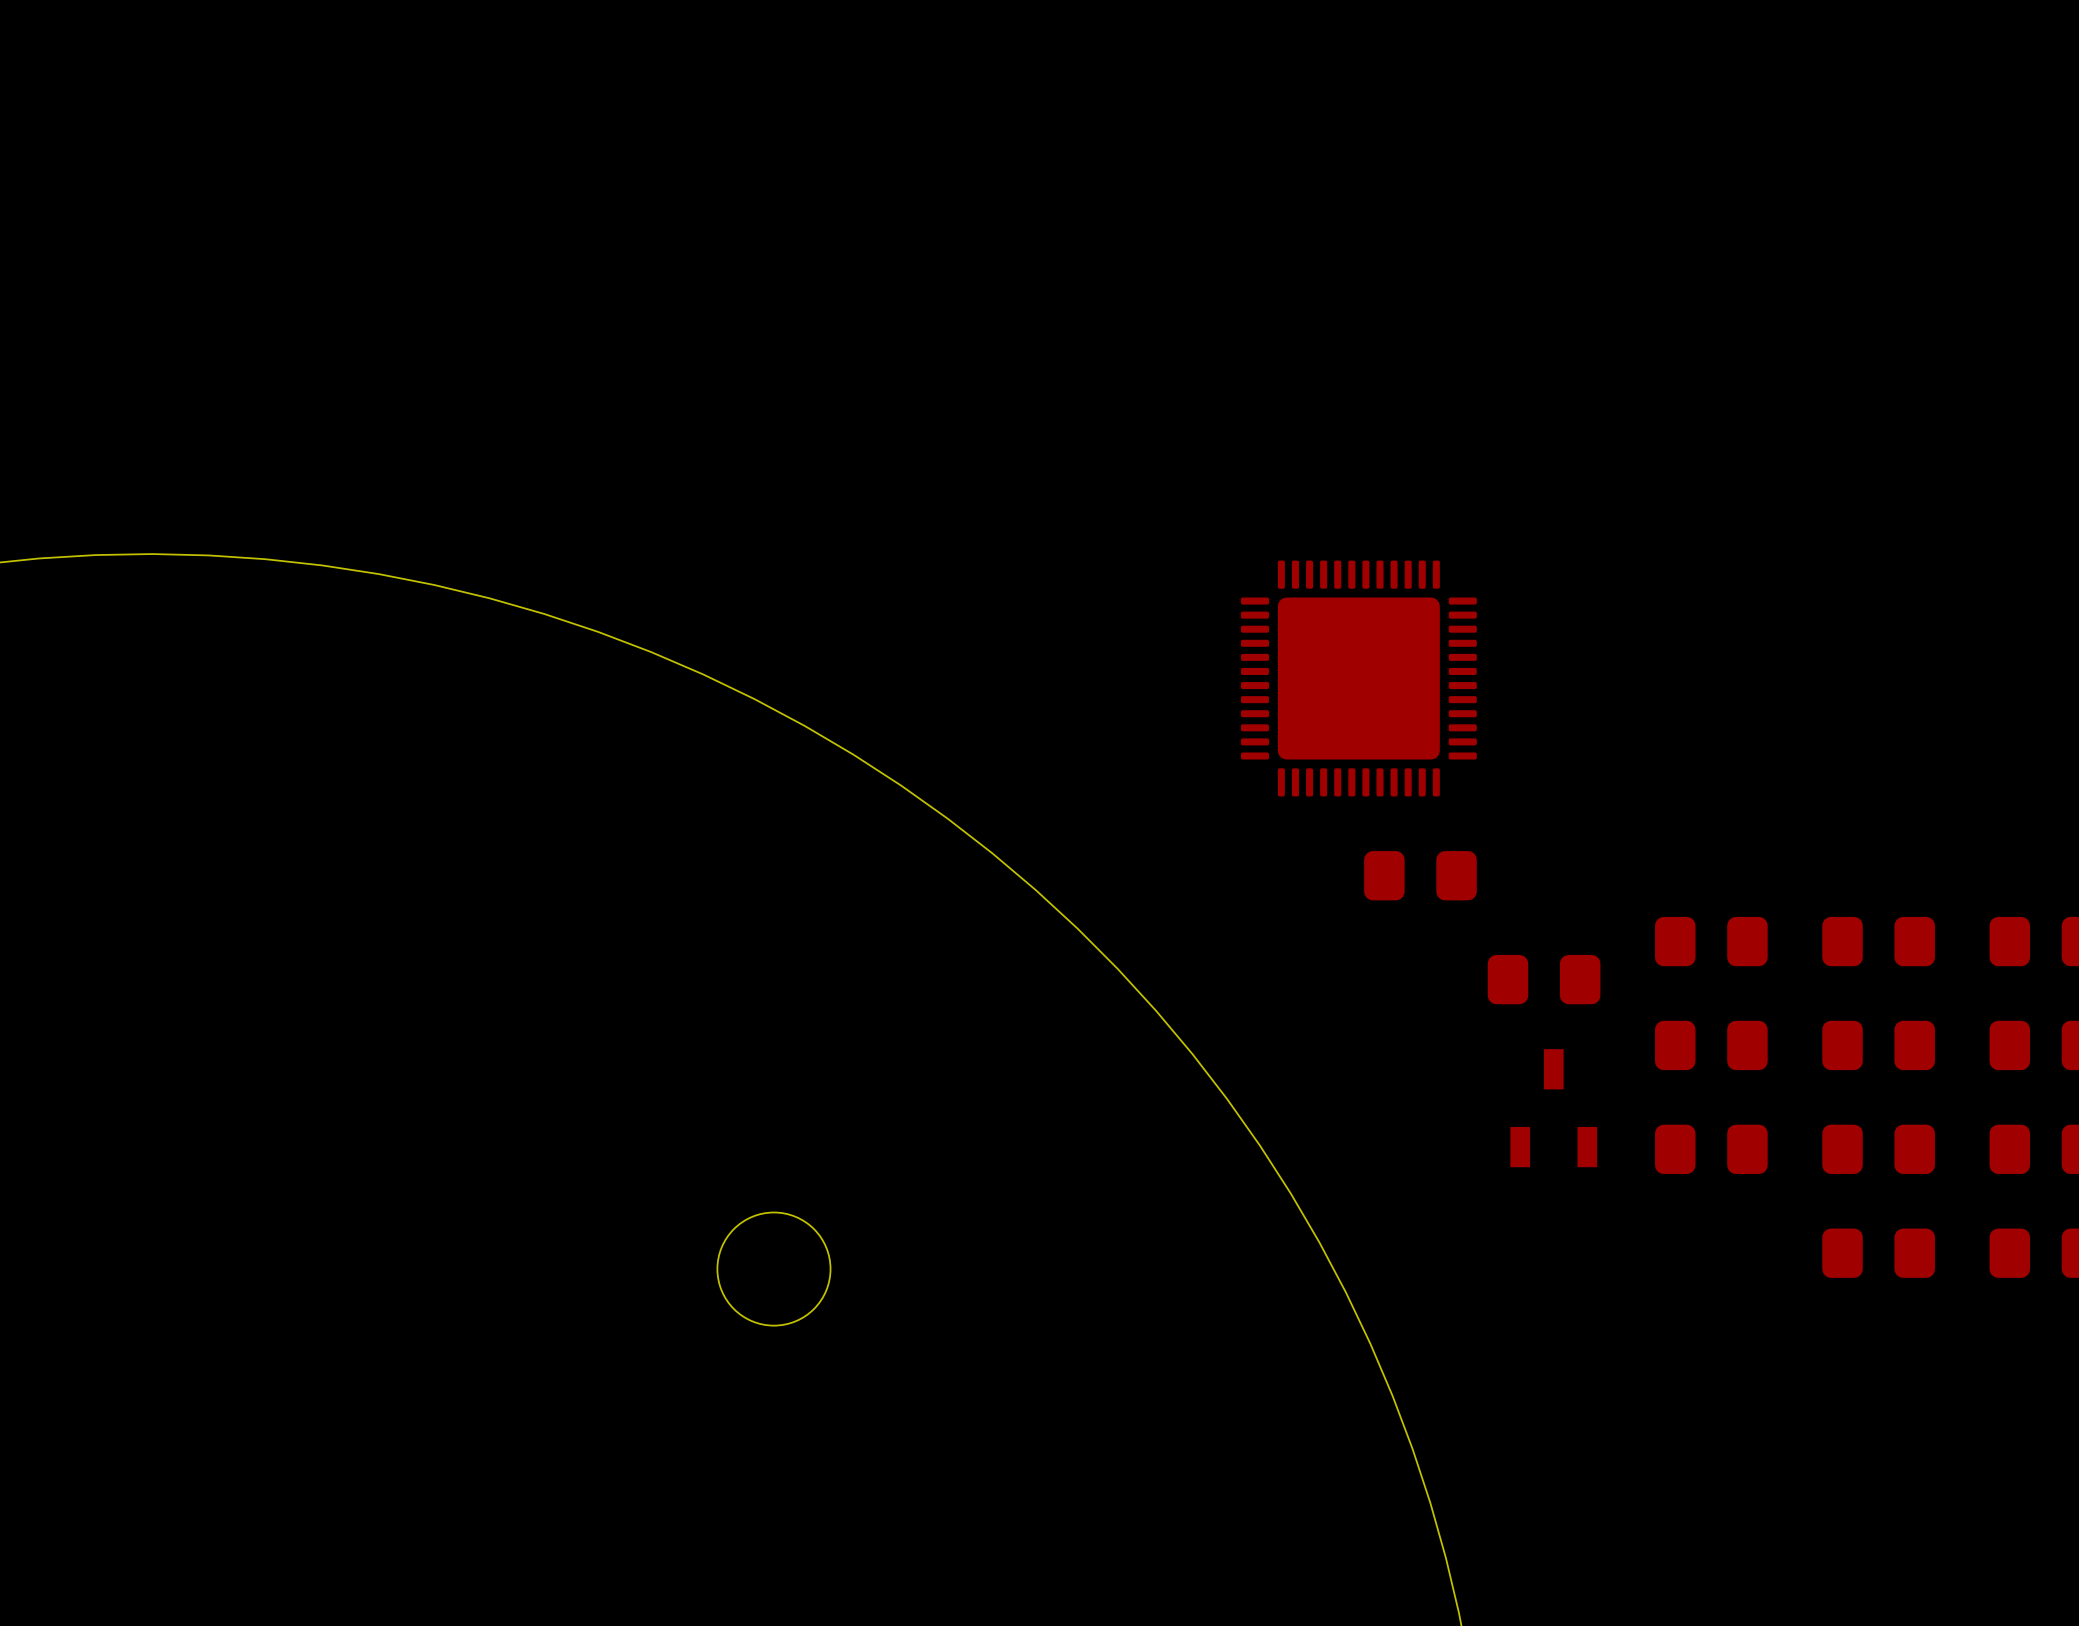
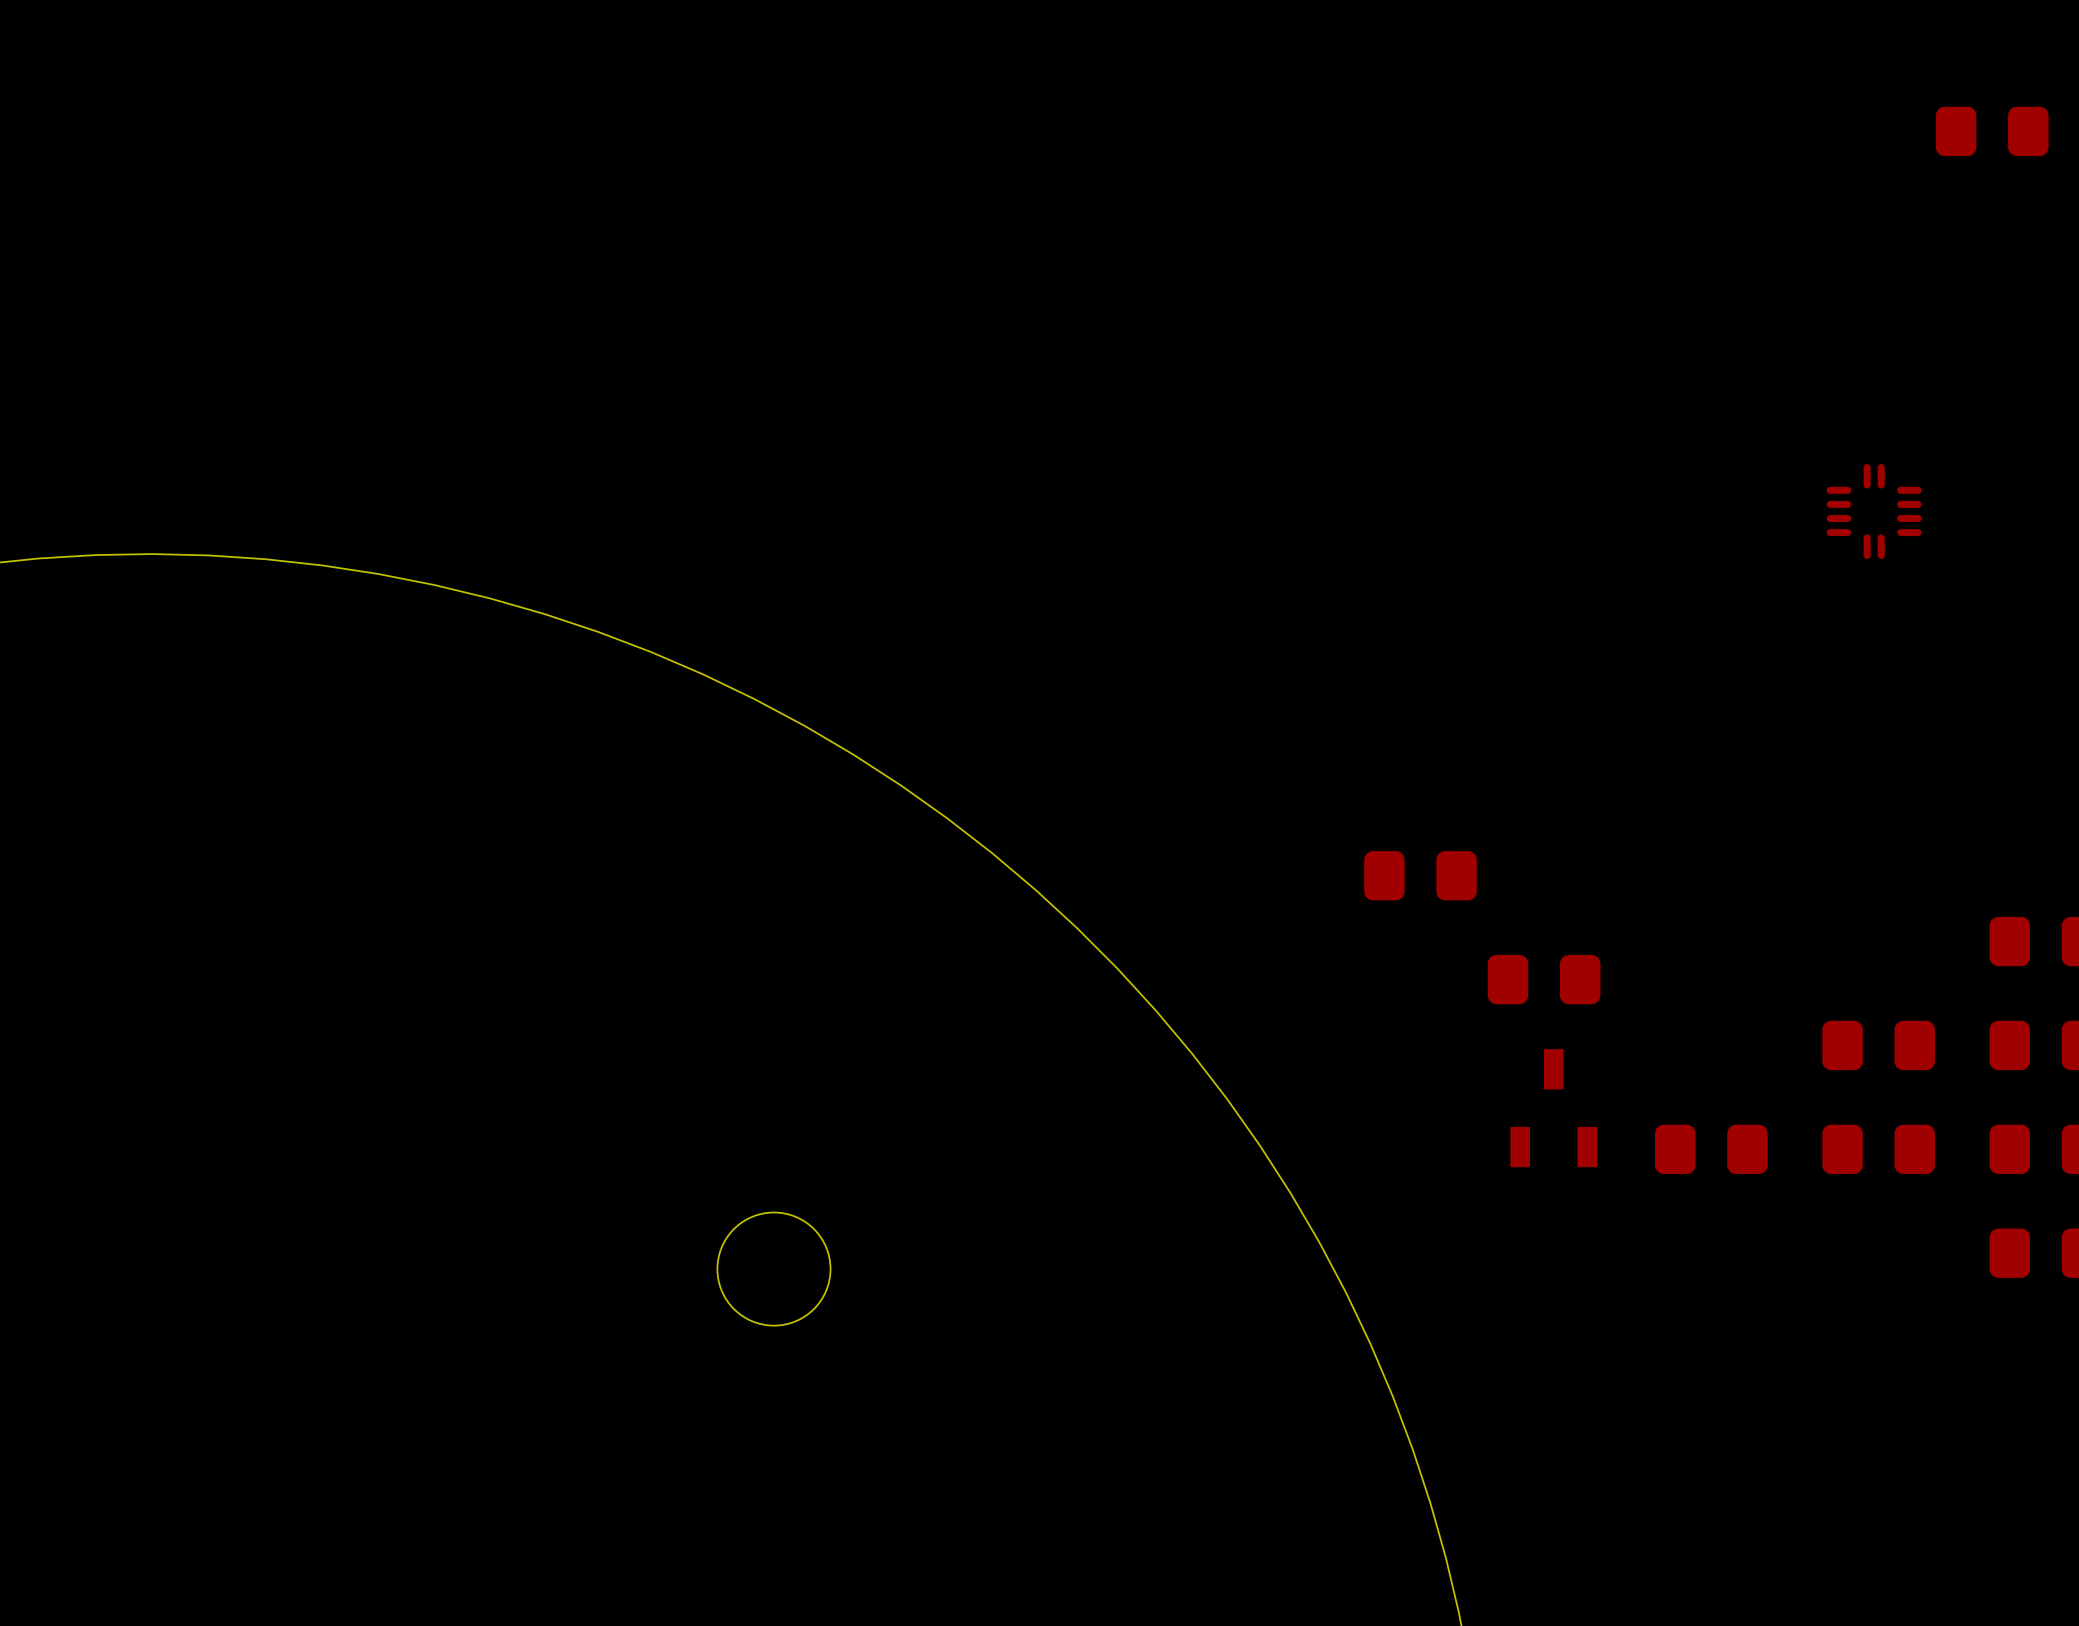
part: none -> (1992, 131)
part: none -> (1874, 511)
part: (1358, 678) -> none
part: (1711, 941) -> none
part: (1878, 941) -> none
part: (1711, 1045) -> none
part: (1878, 1253) -> none

